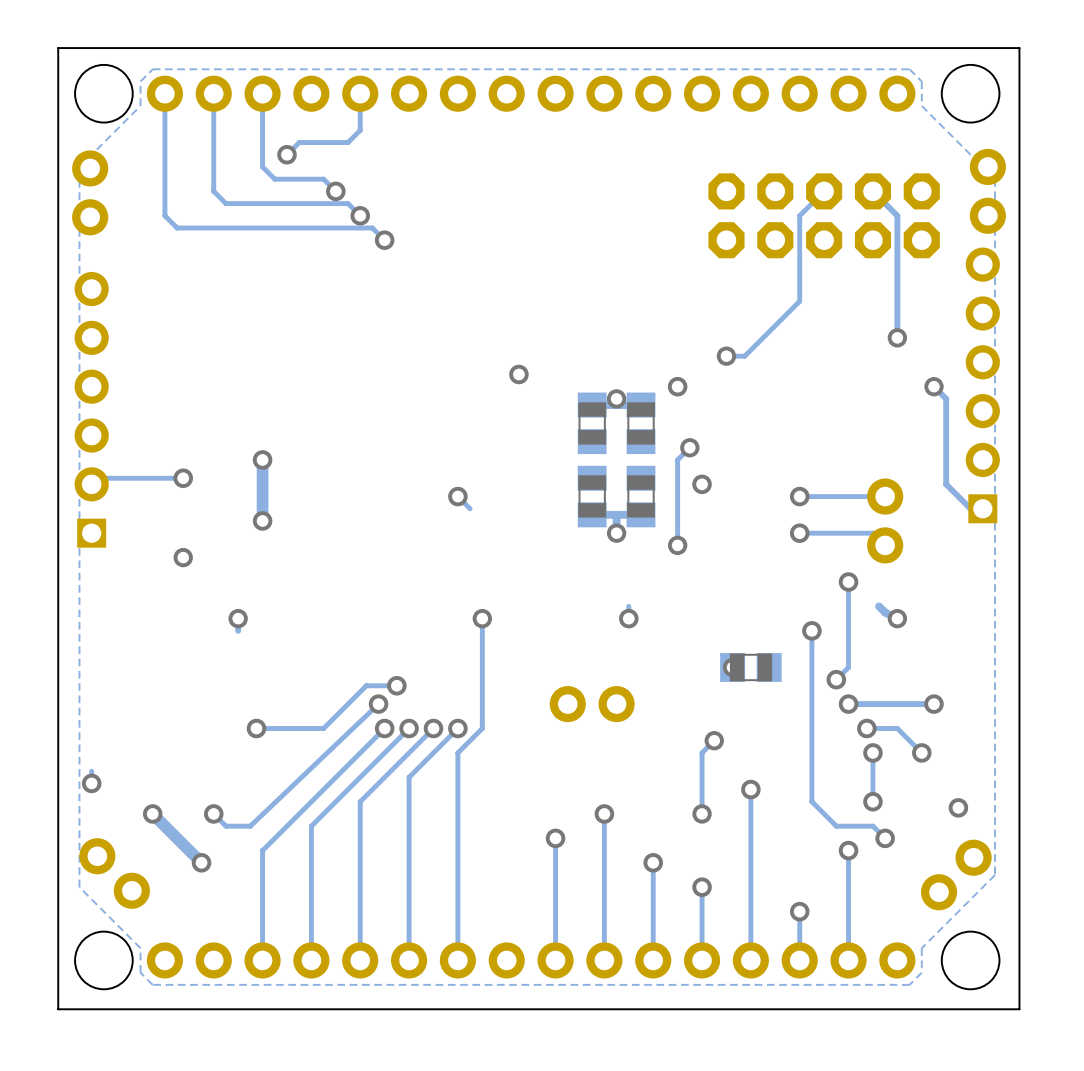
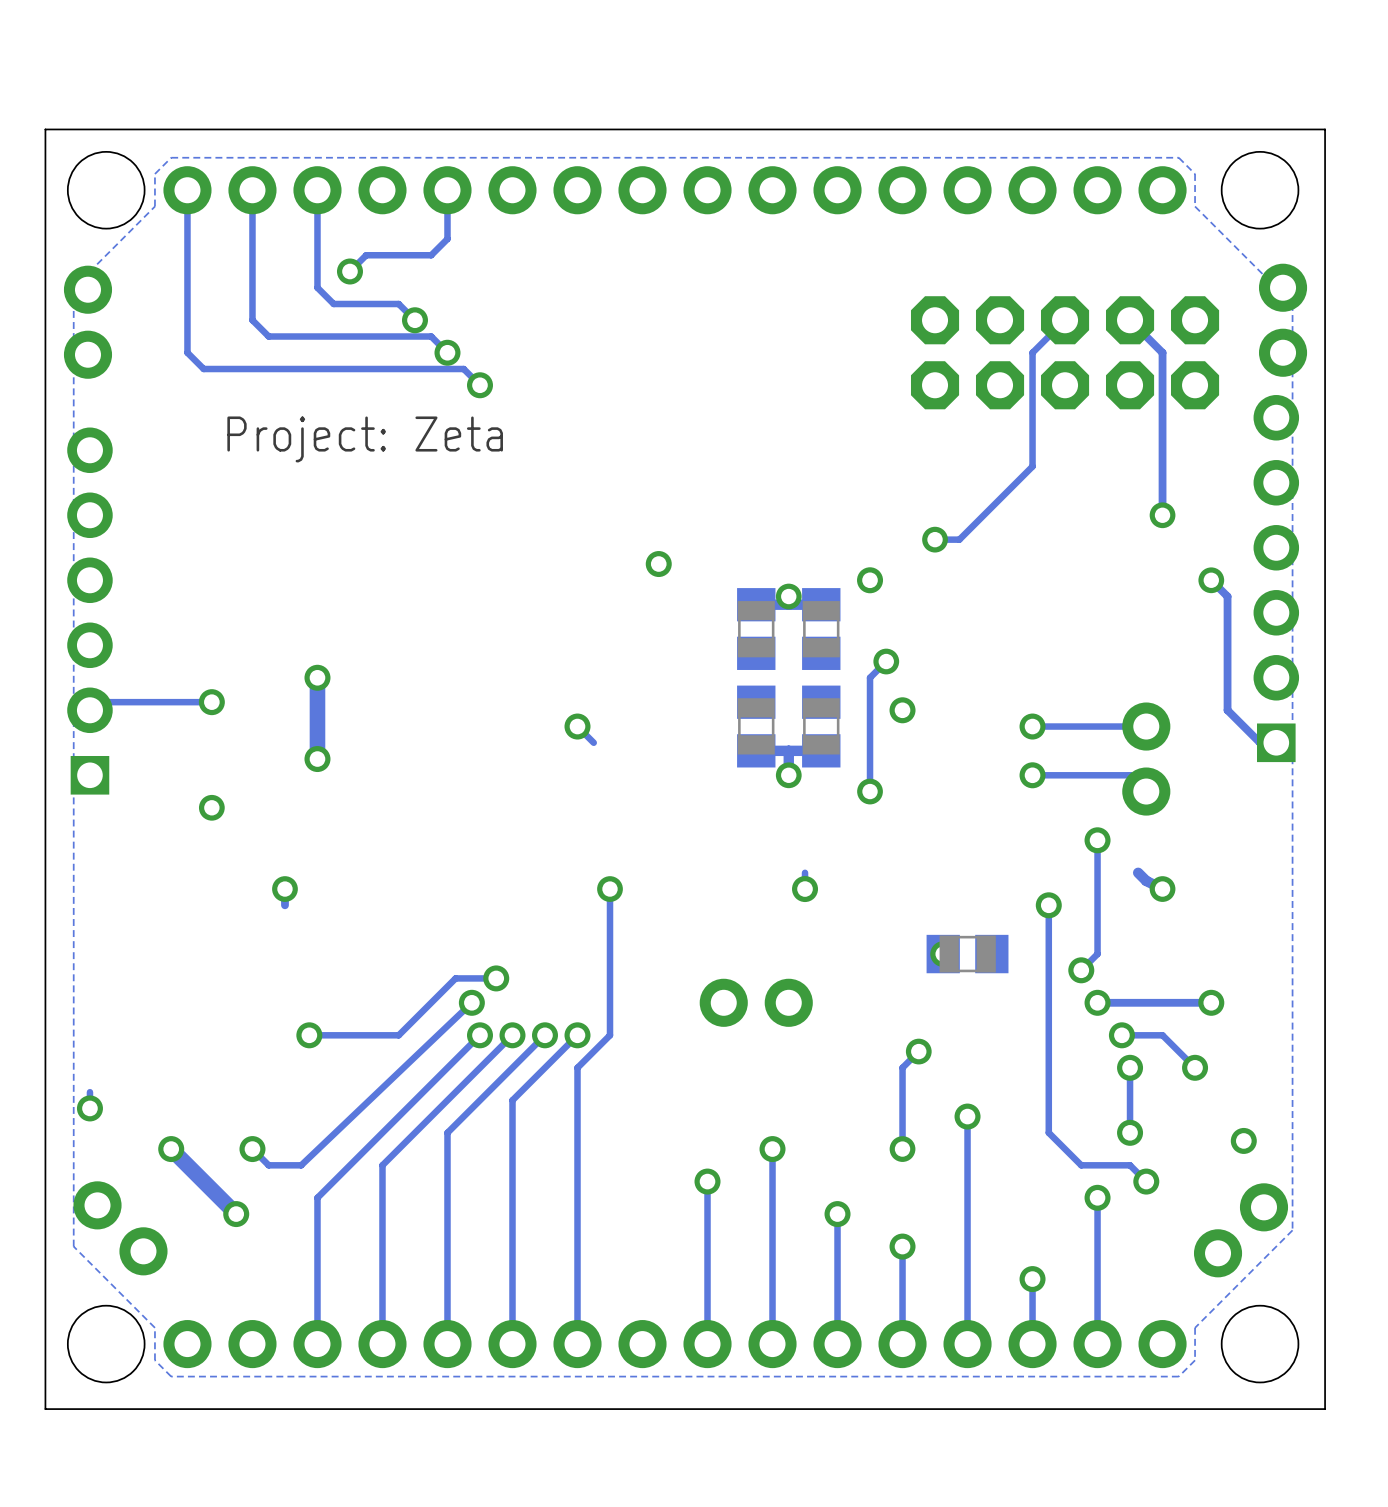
text: none -> Project: Zeta (365, 439)

